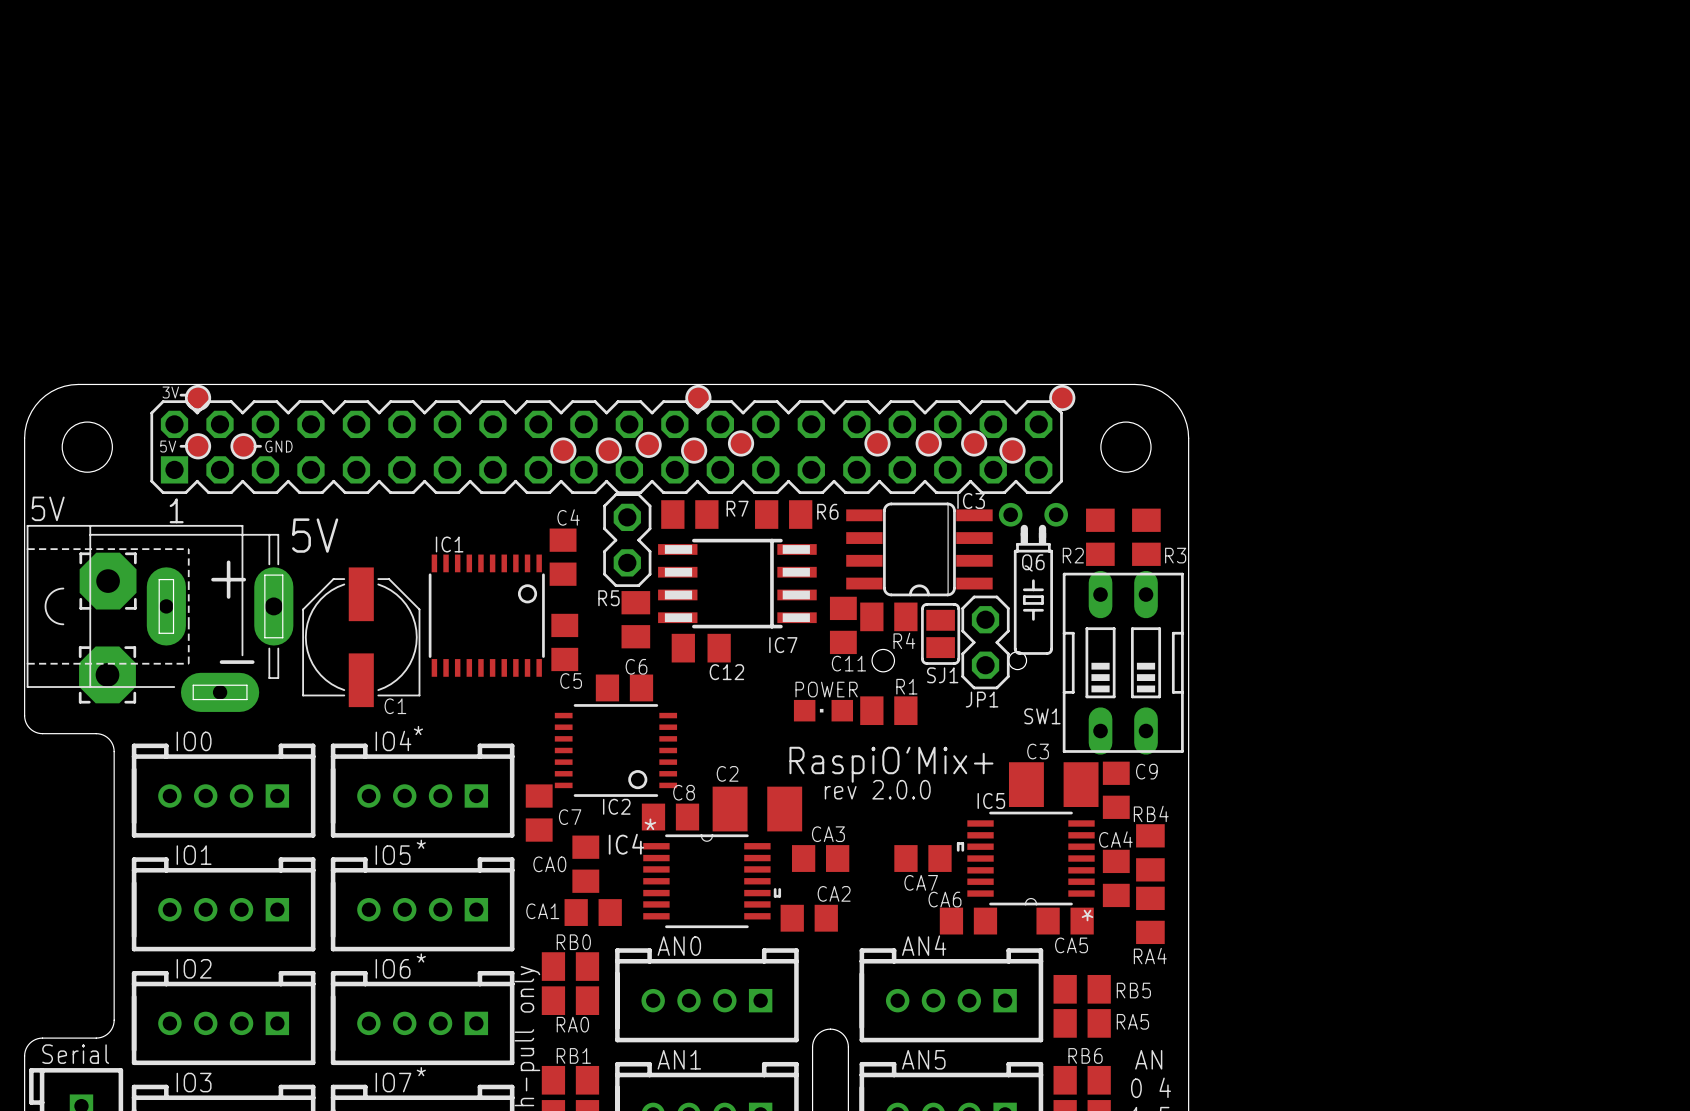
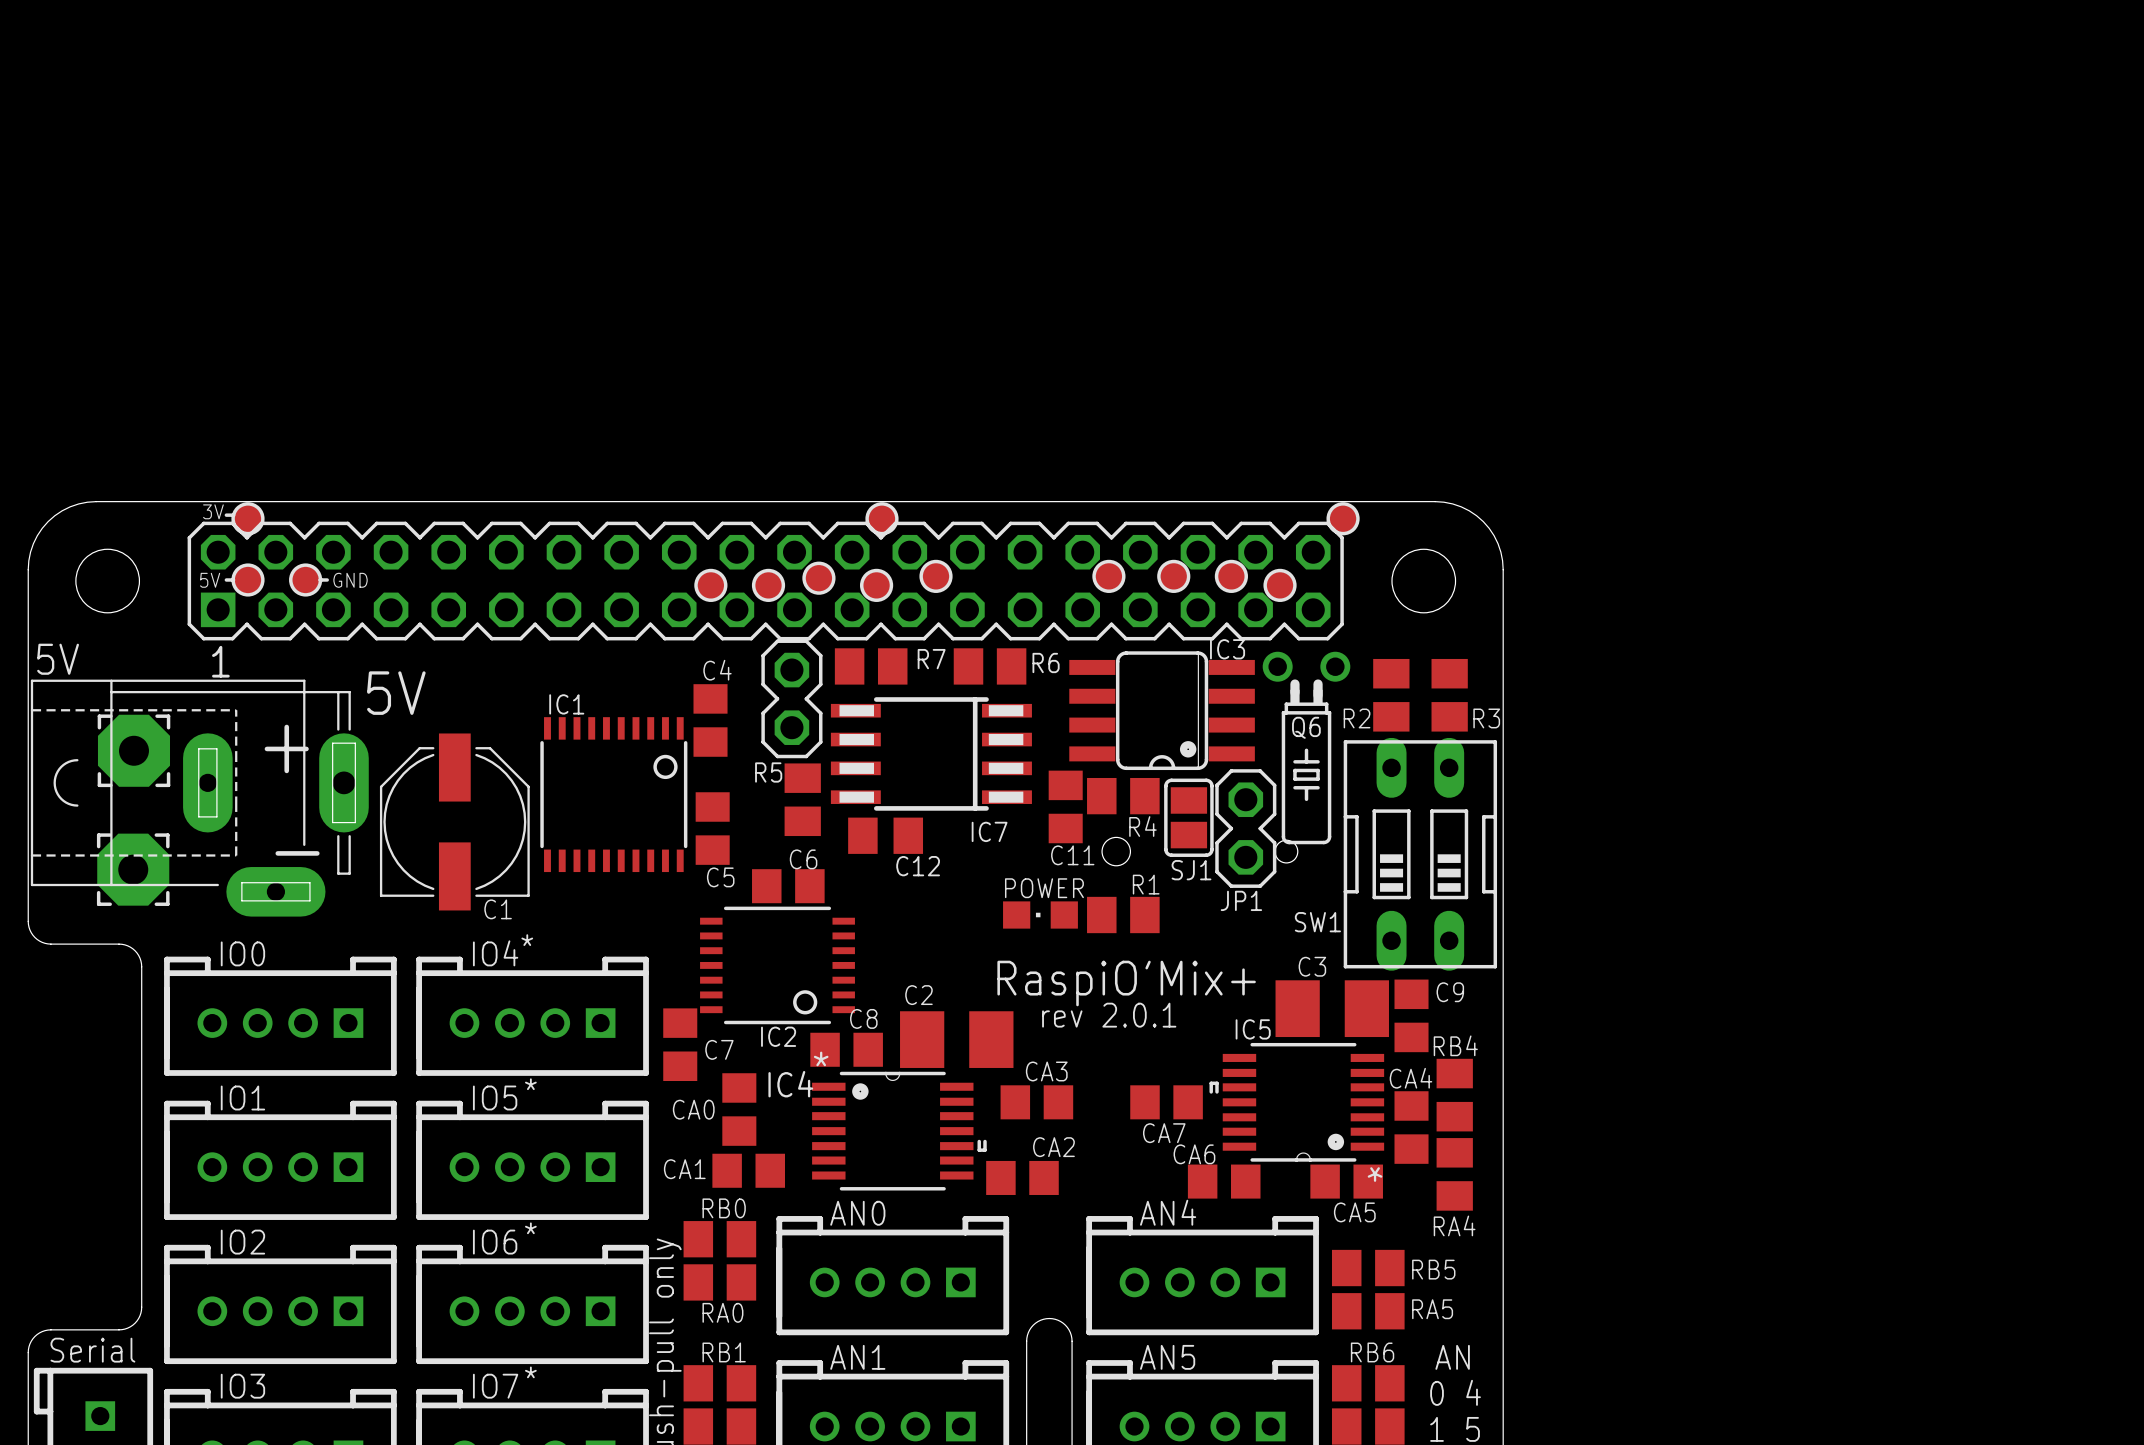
drawing: none -> [1179, 741, 1197, 758]
text: rev 2.0.0 (877, 789) -> rev 2.0.1 (1109, 1015)
drawing: none -> [852, 1083, 869, 1100]
drawing: none -> [1327, 1133, 1345, 1151]

